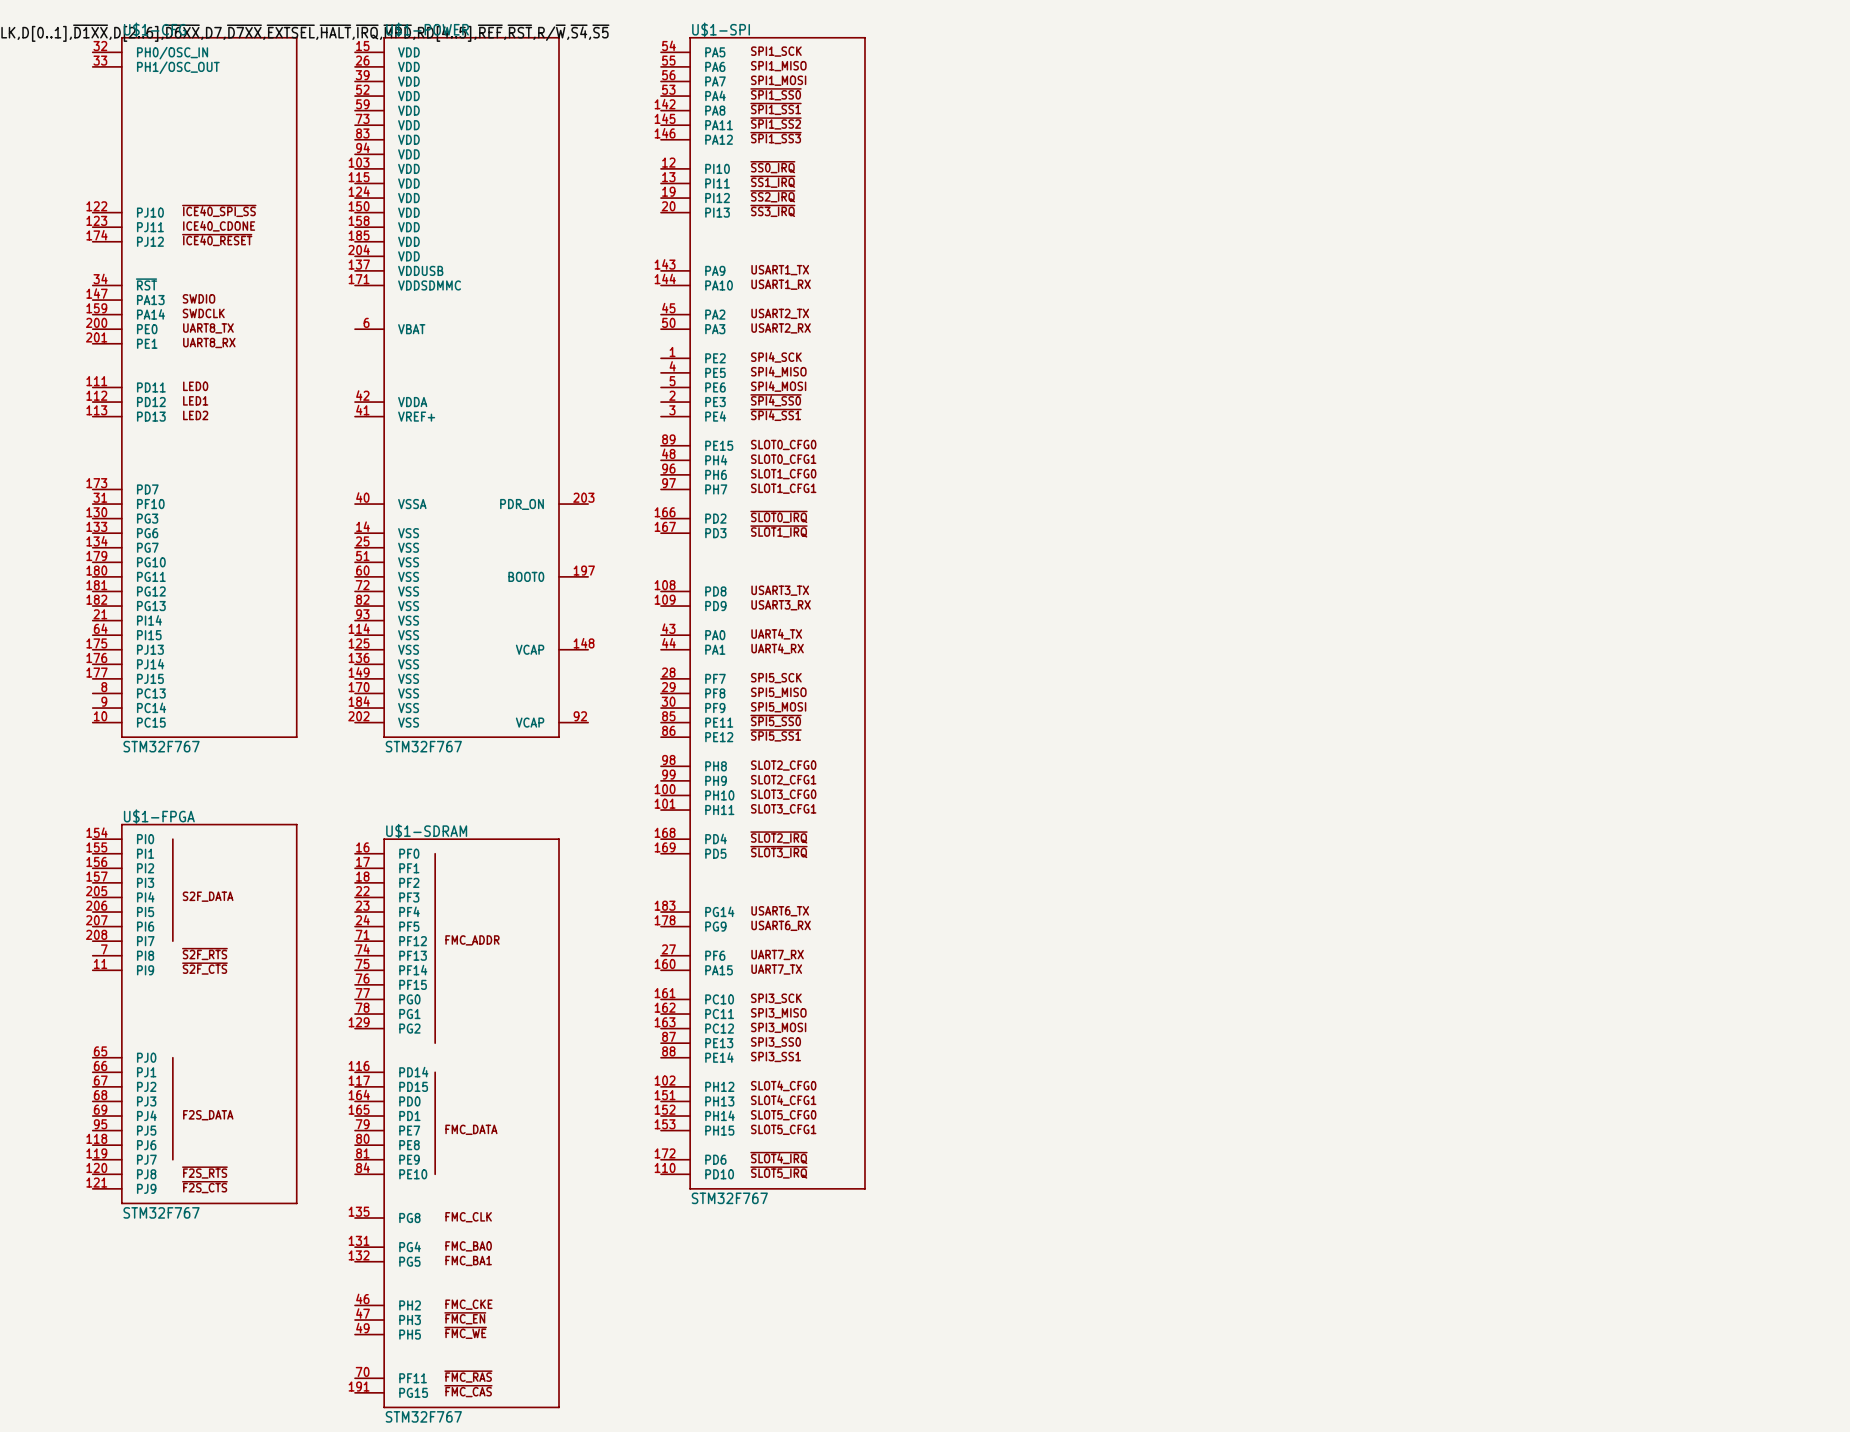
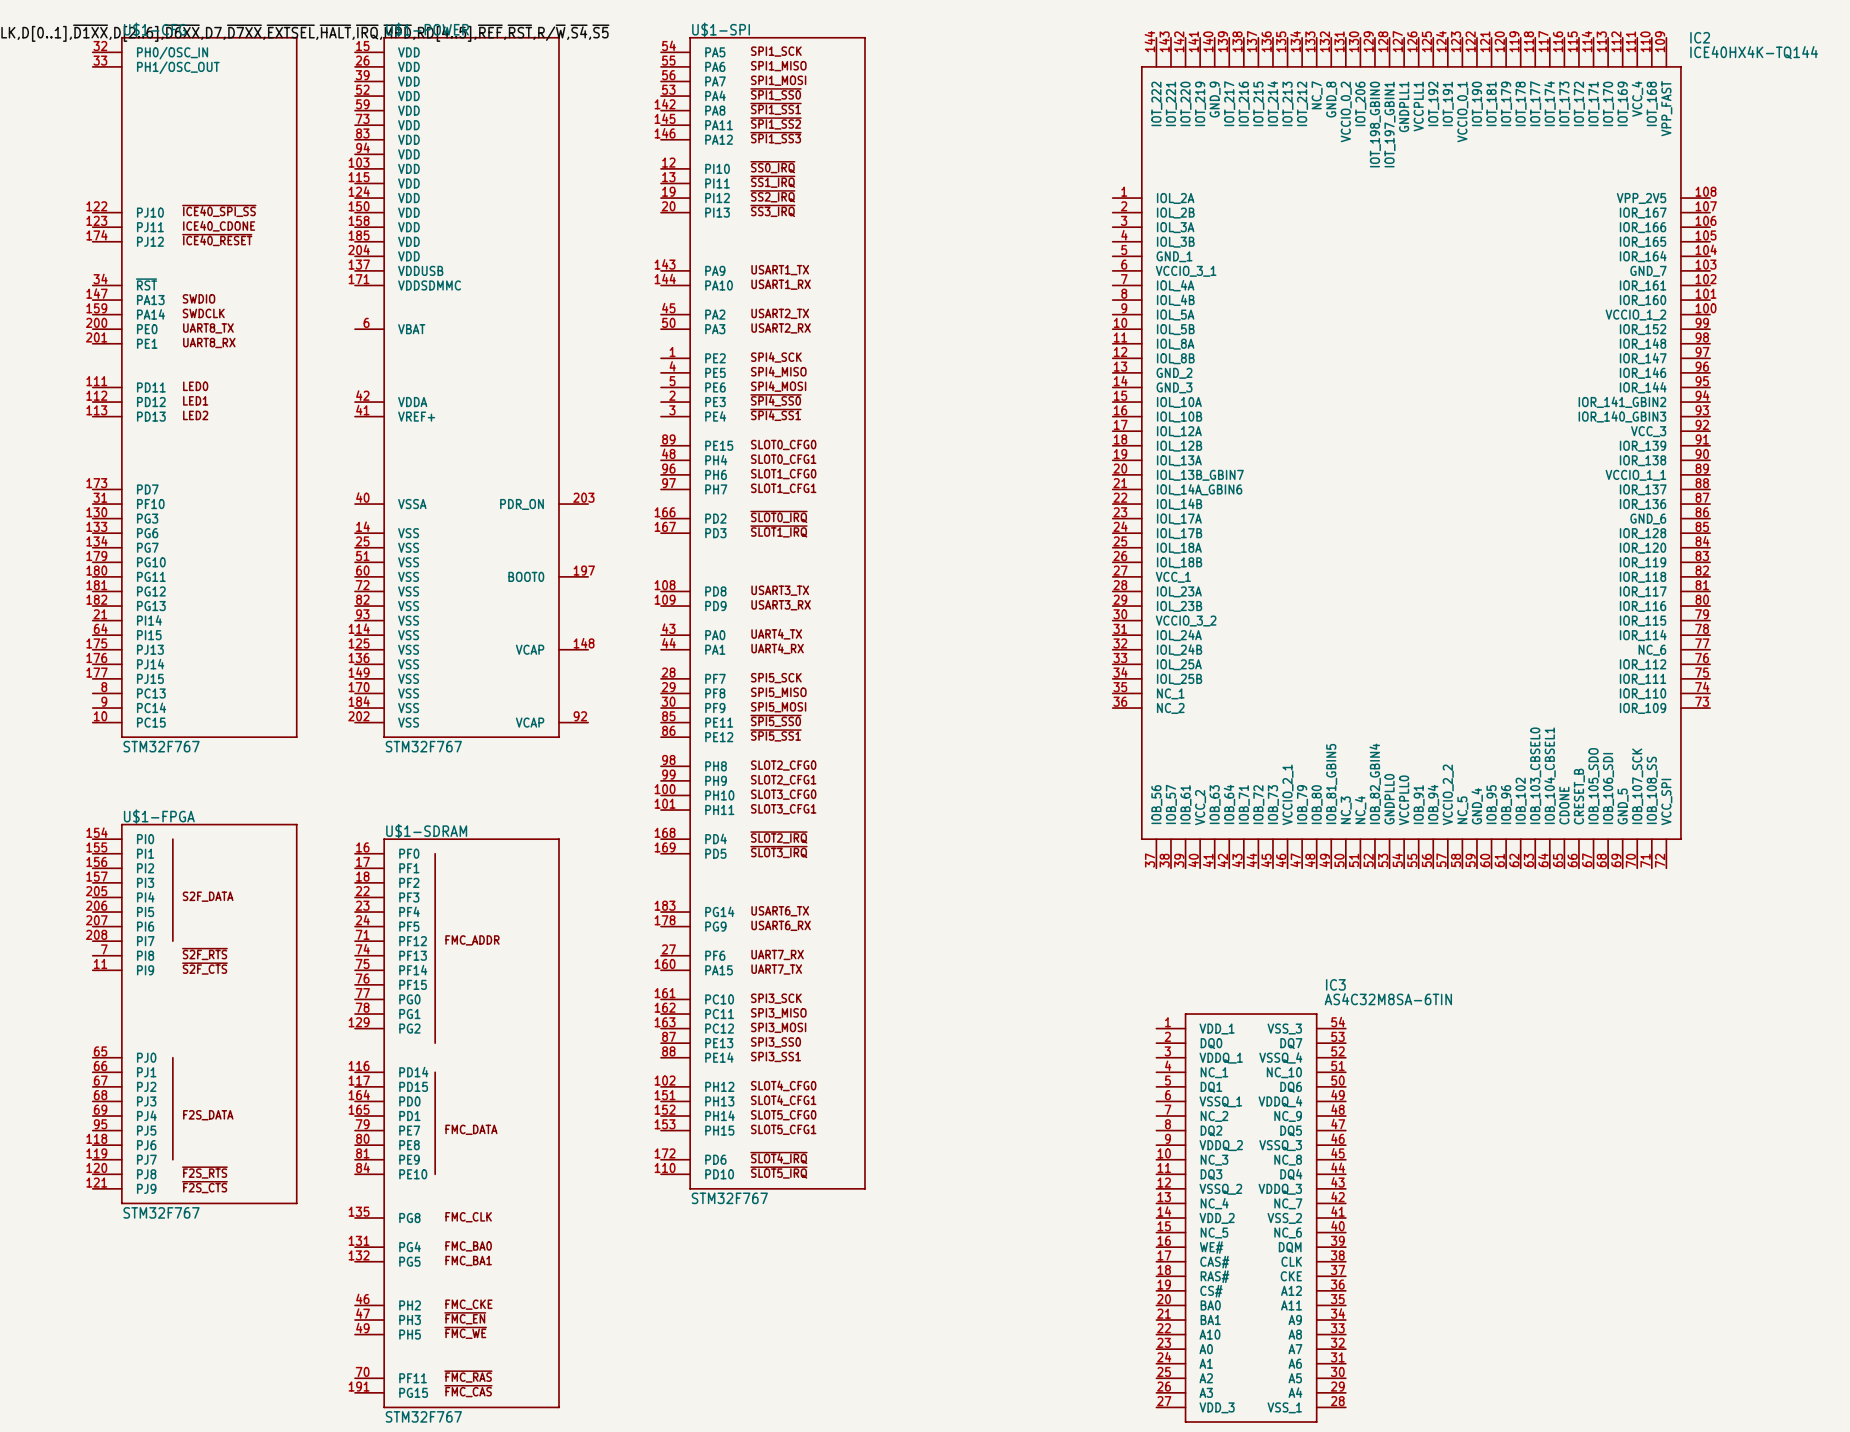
IC2: none -> ICE40HX4K-TQ144 (1411, 453)
IC3: none -> AS4C32M8SA-6TIN (1251, 1218)

